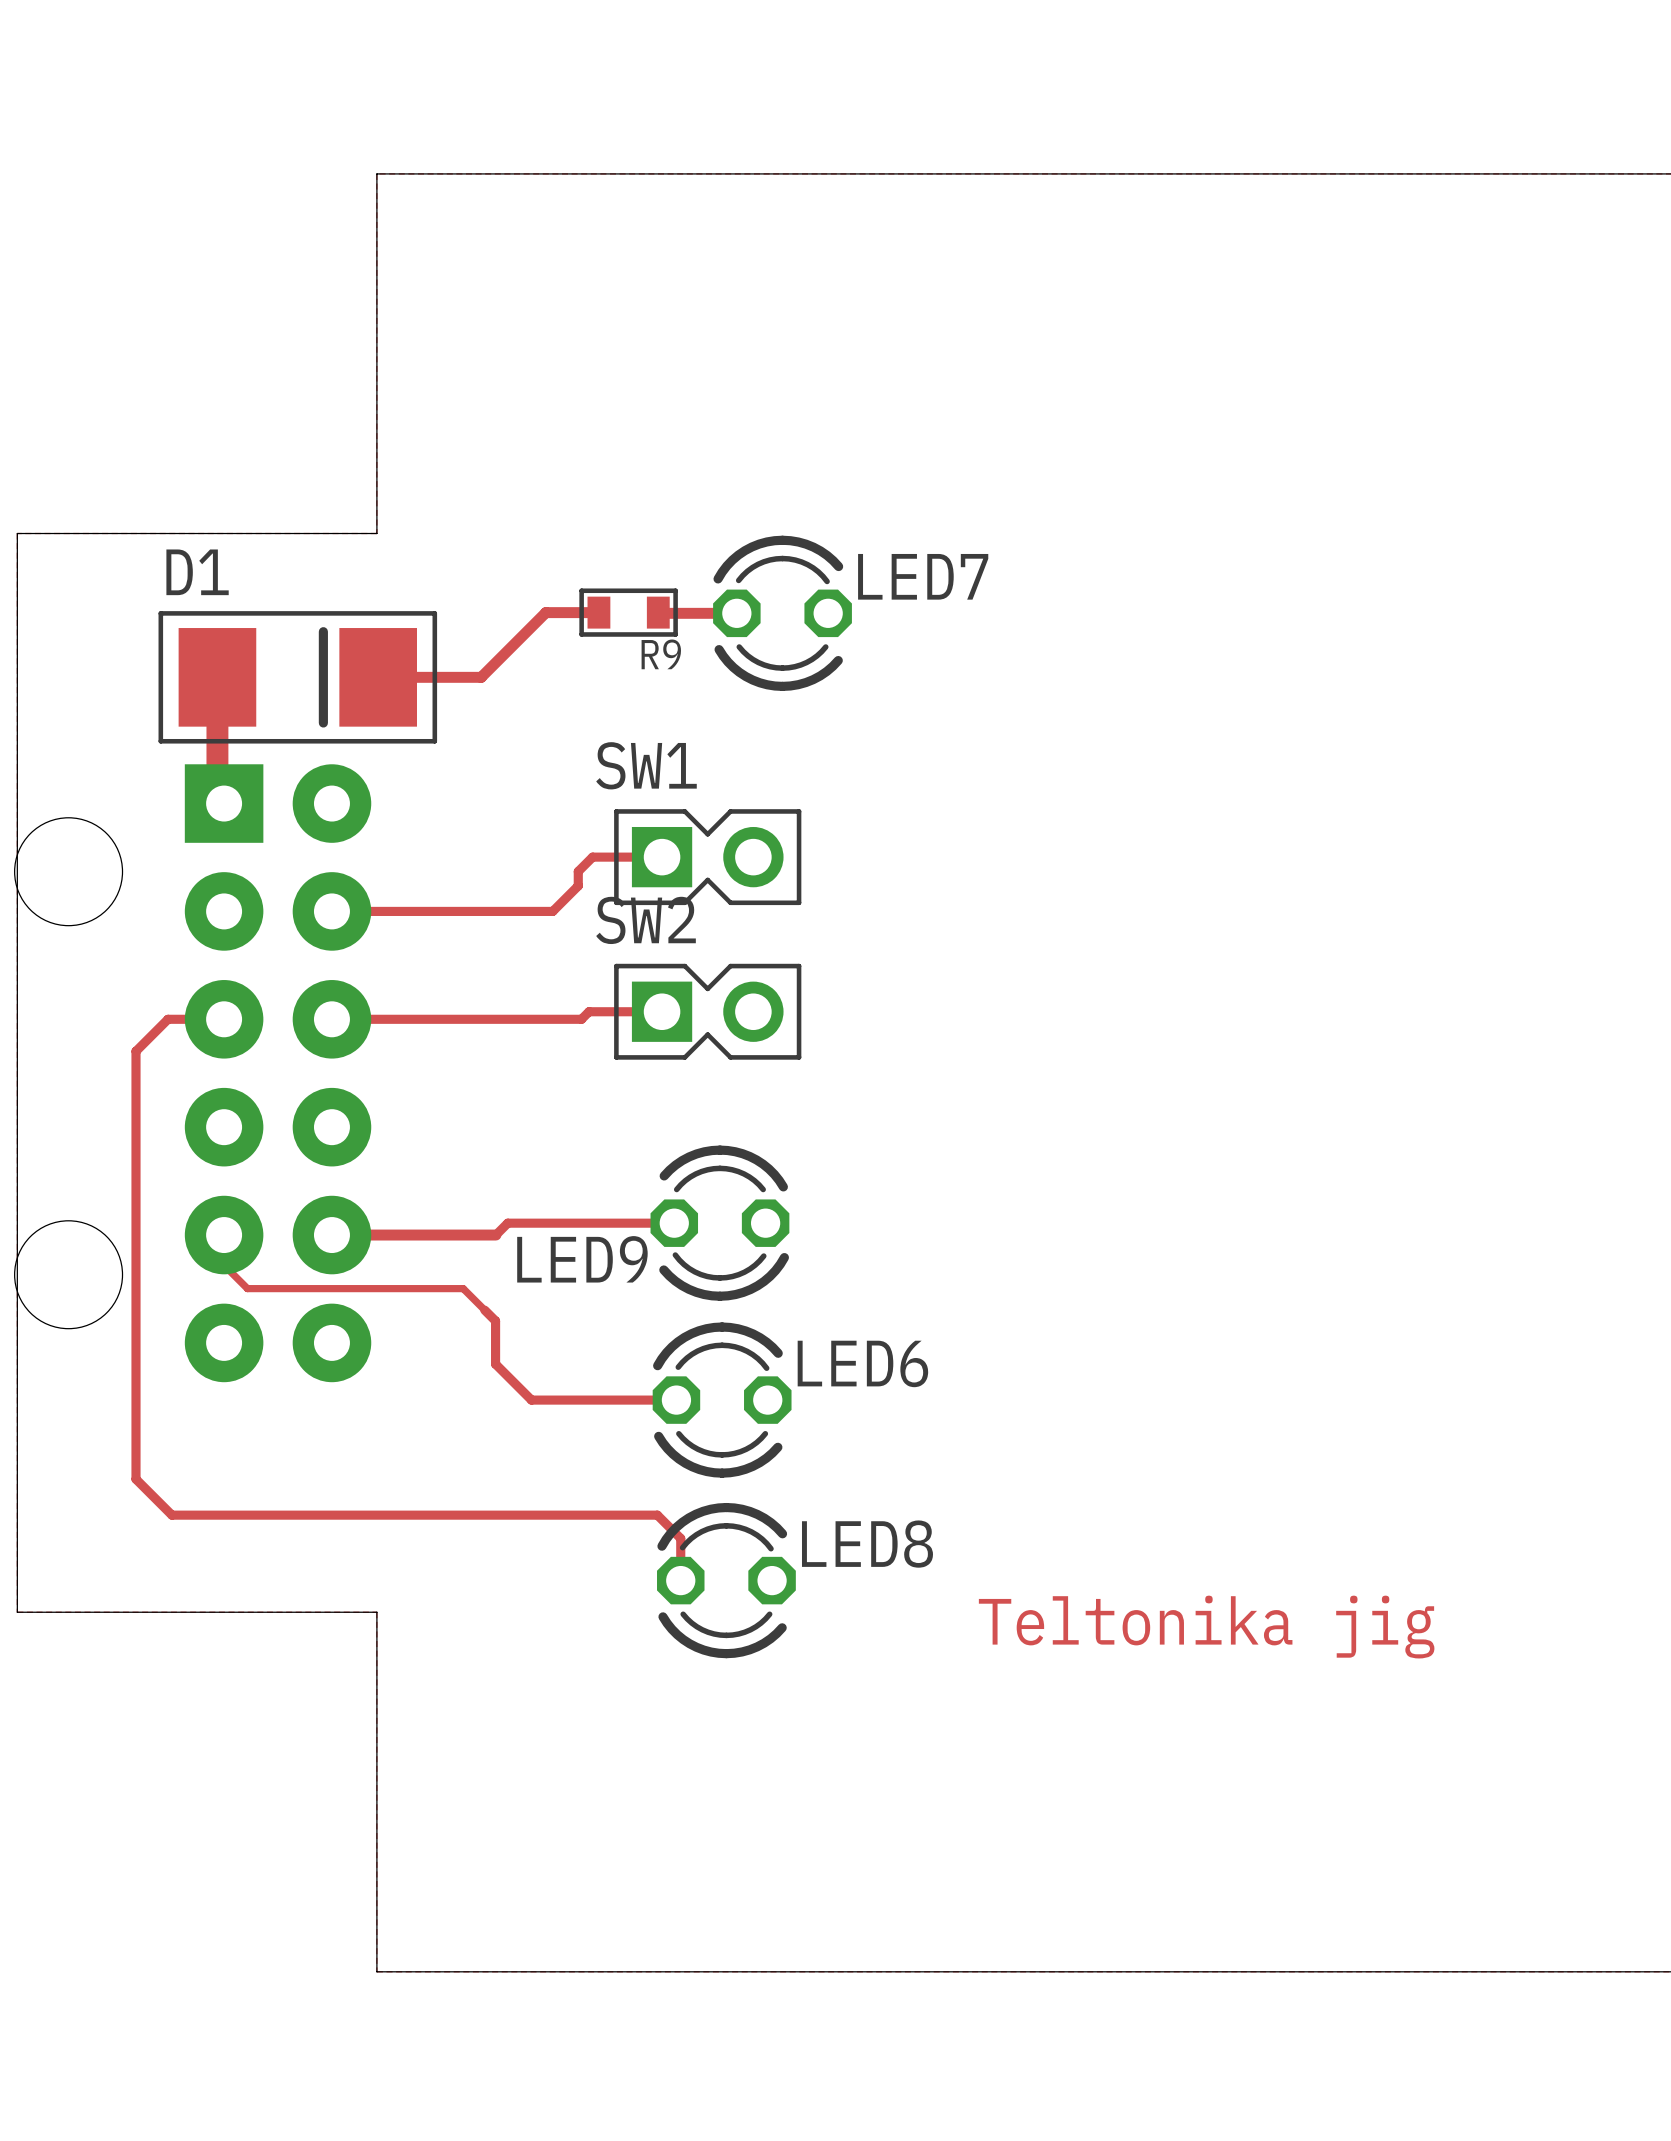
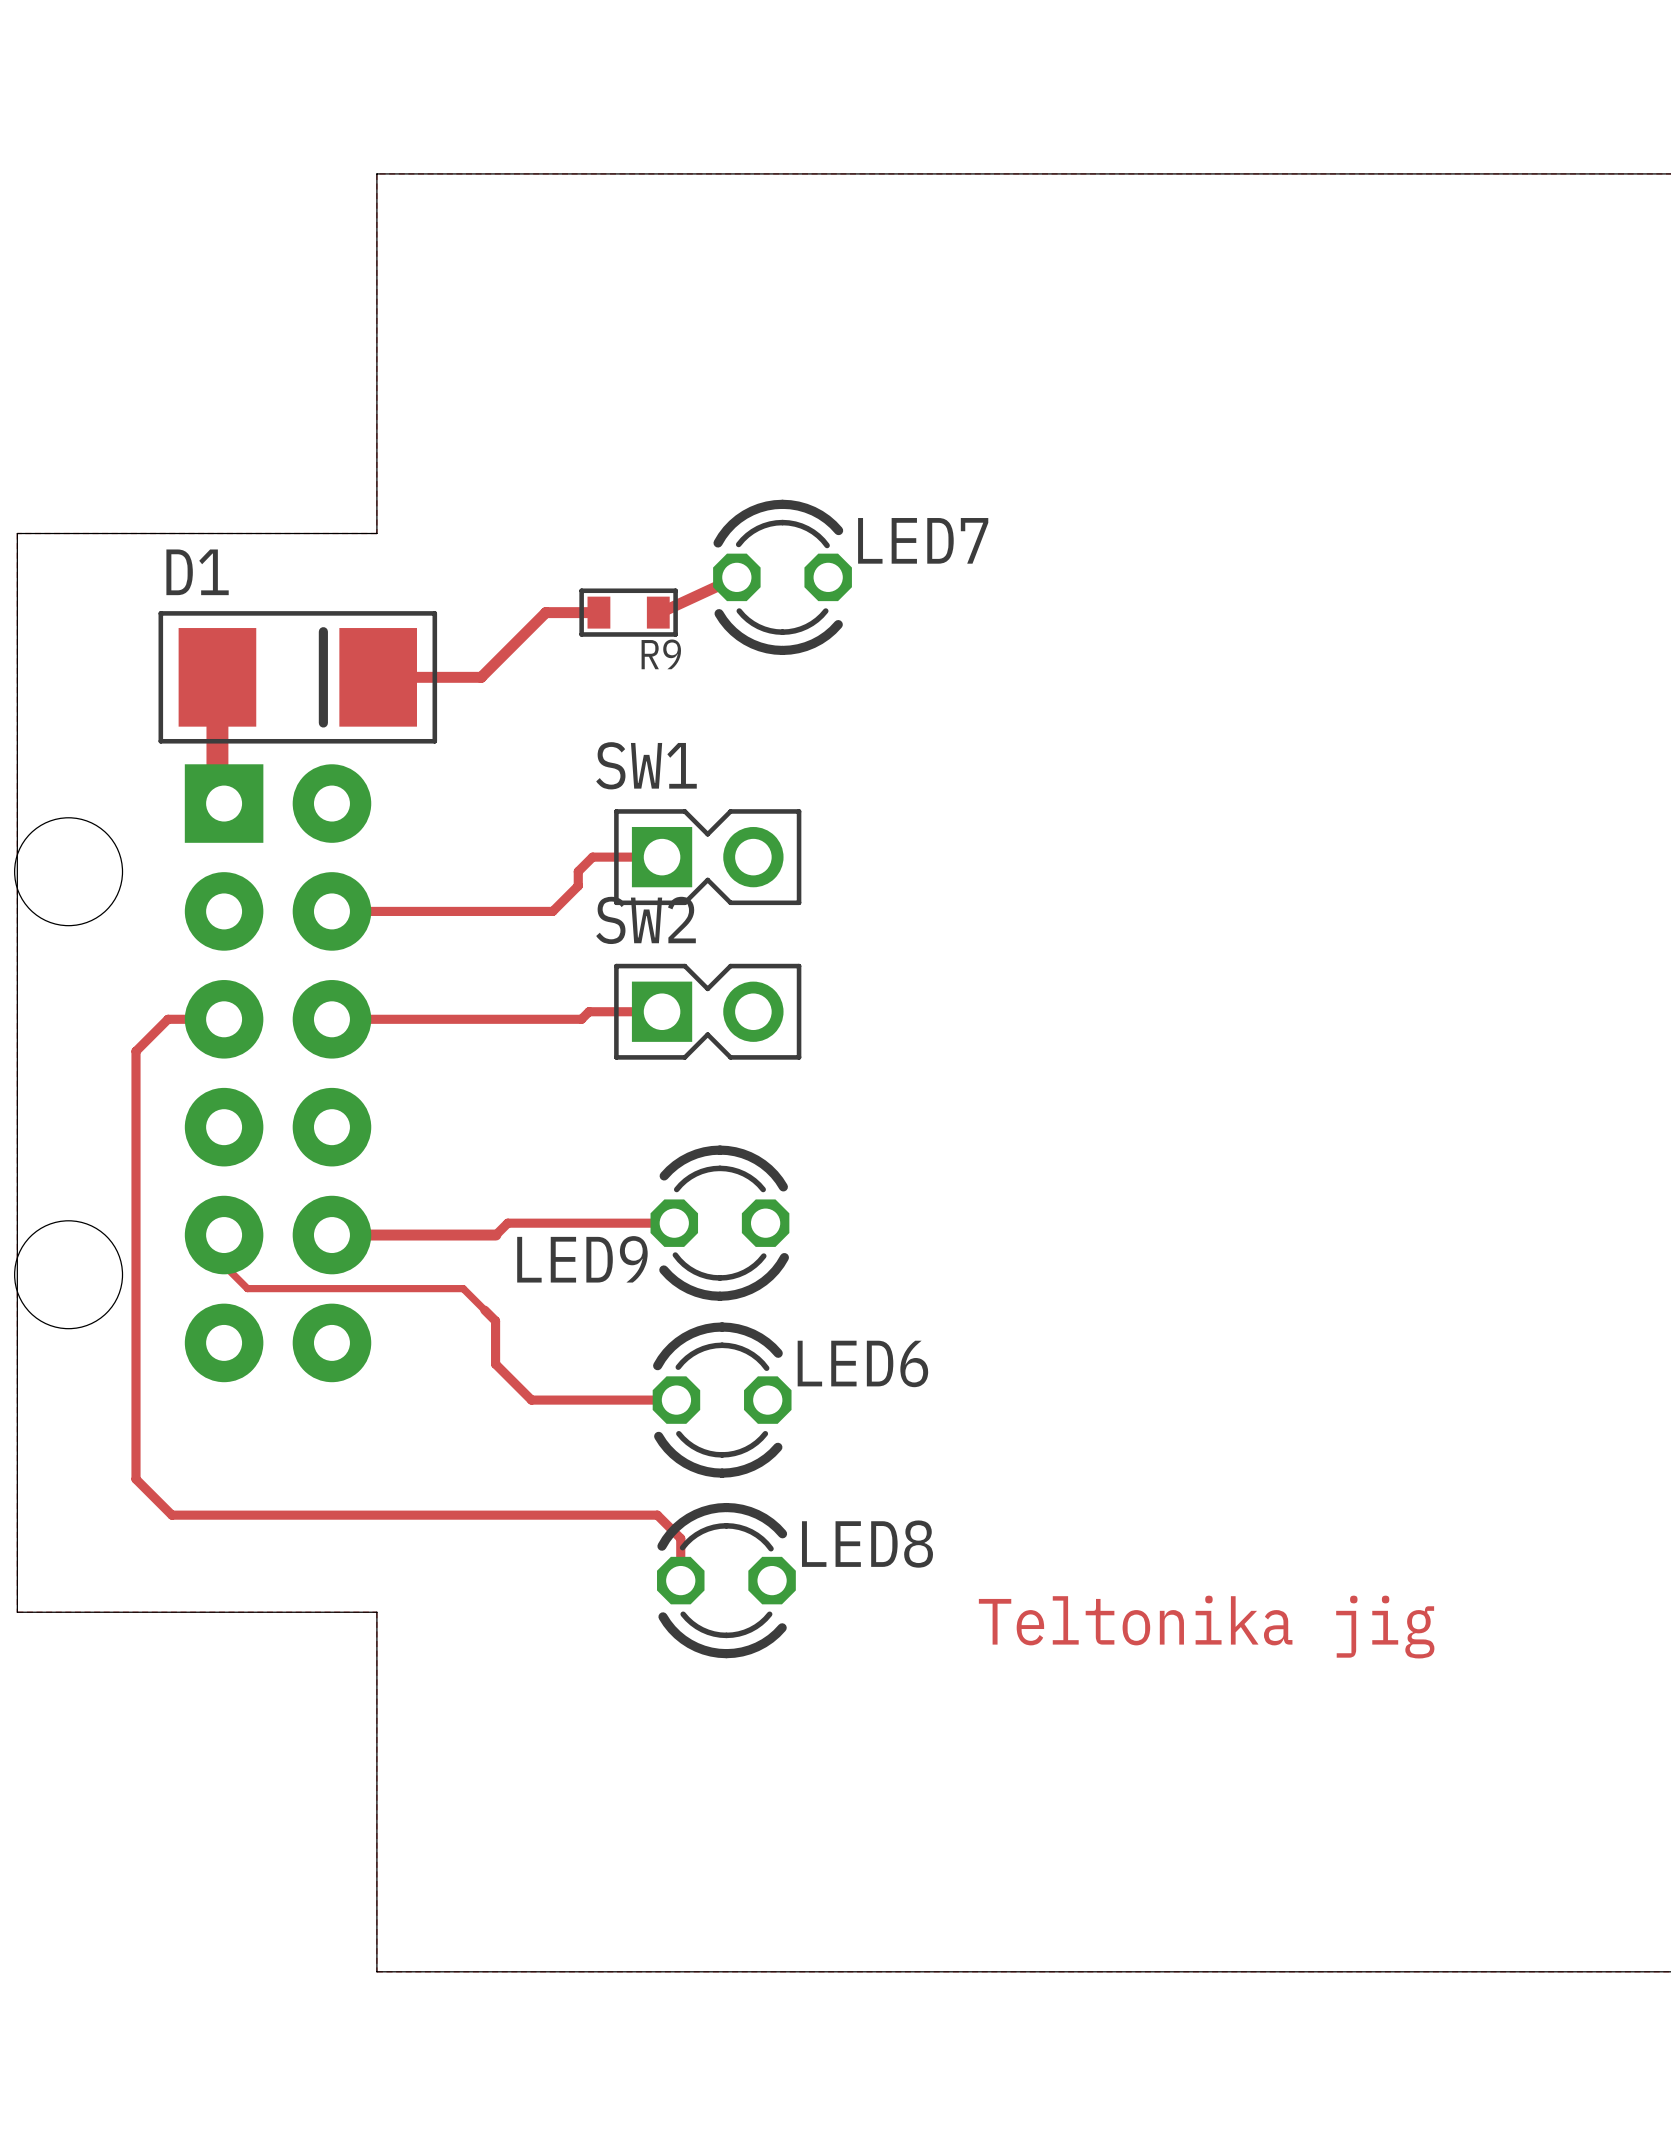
track: (659, 613) (736, 613) -> (659, 613) (736, 577)
LED7 position: (782, 613) -> (782, 577)

